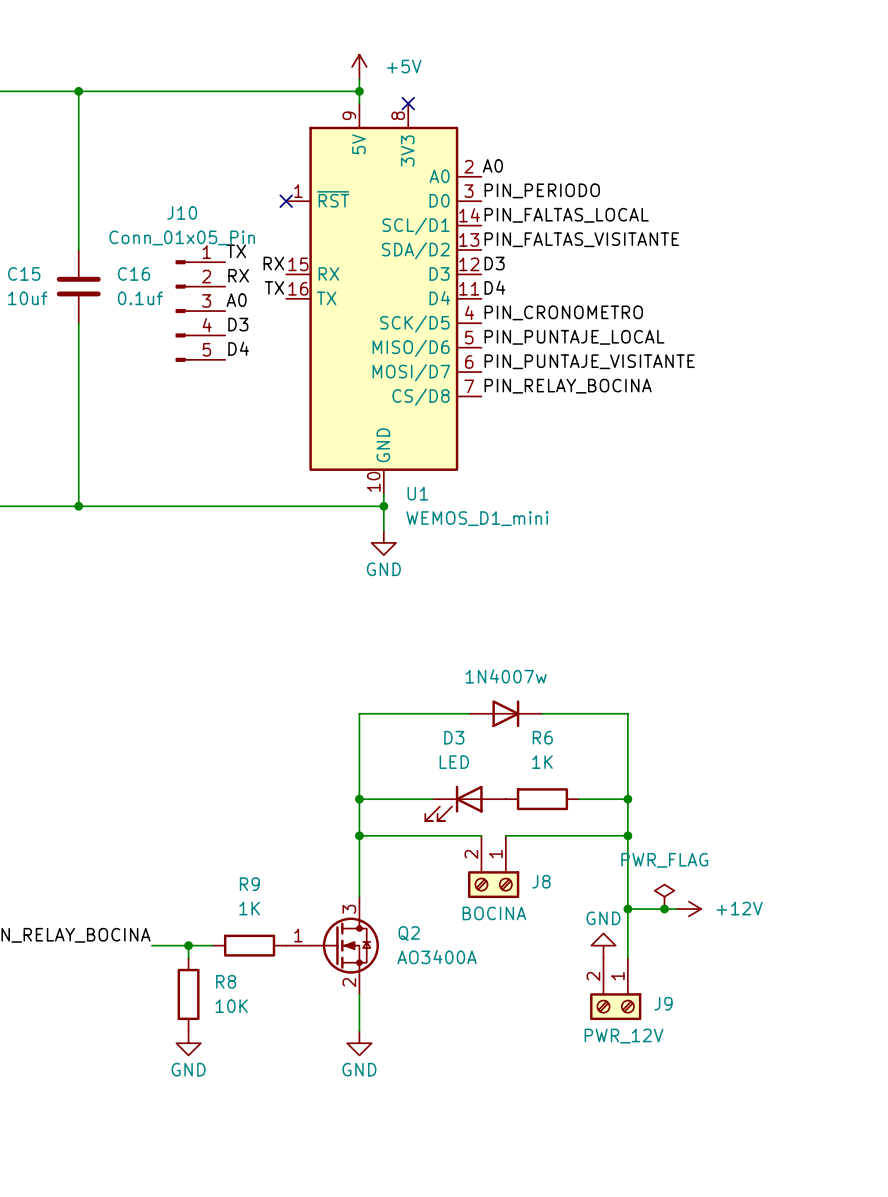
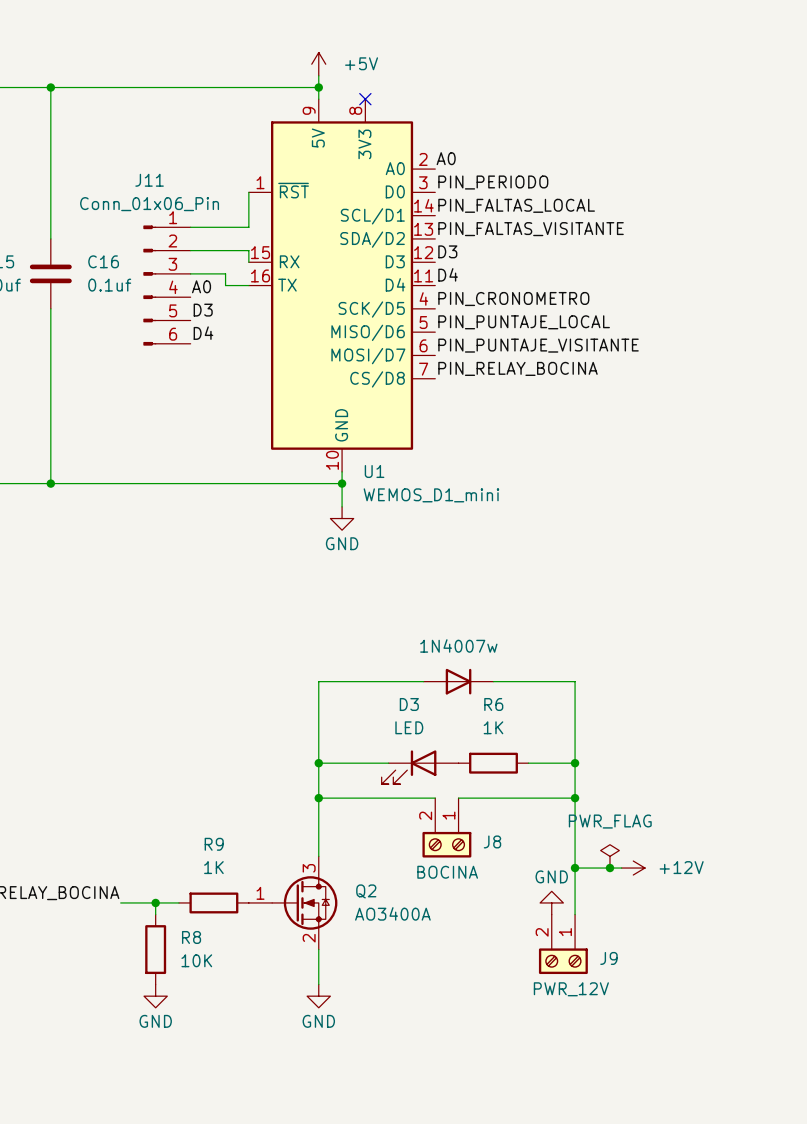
wire: none -> (248, 192) (248, 227) (190, 227)
no-connect mark: (286, 201) -> none
label: TX (236, 251) -> none
wire: none -> (190, 250) (248, 250) (248, 262)
label: RX (273, 263) -> none
label: RX (238, 275) -> none
wire: none -> (190, 273) (225, 273) (225, 285) (248, 285)
label: TX (274, 287) -> none
J11: none -> Conn_01x06_Pin (166, 285)
J10: Conn_01x05_Pin (200, 311) -> none

